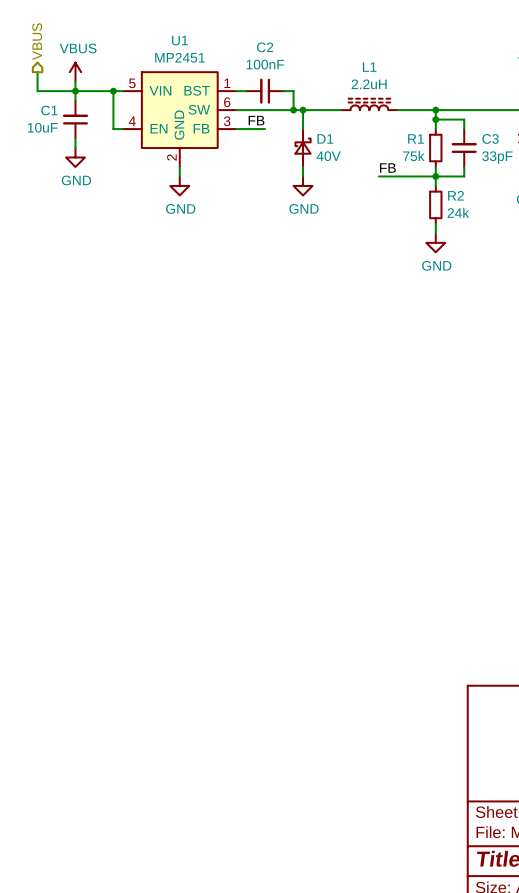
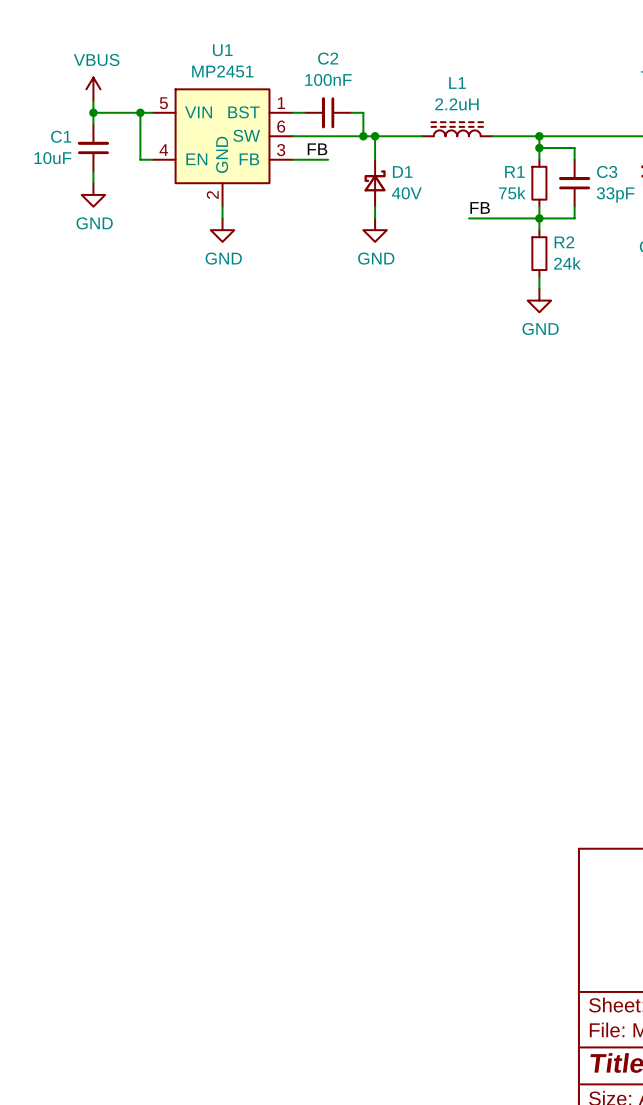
hierarchical label: VBUS (37, 41) -> none
wire: (37, 72) (37, 91) (75, 91) -> none

